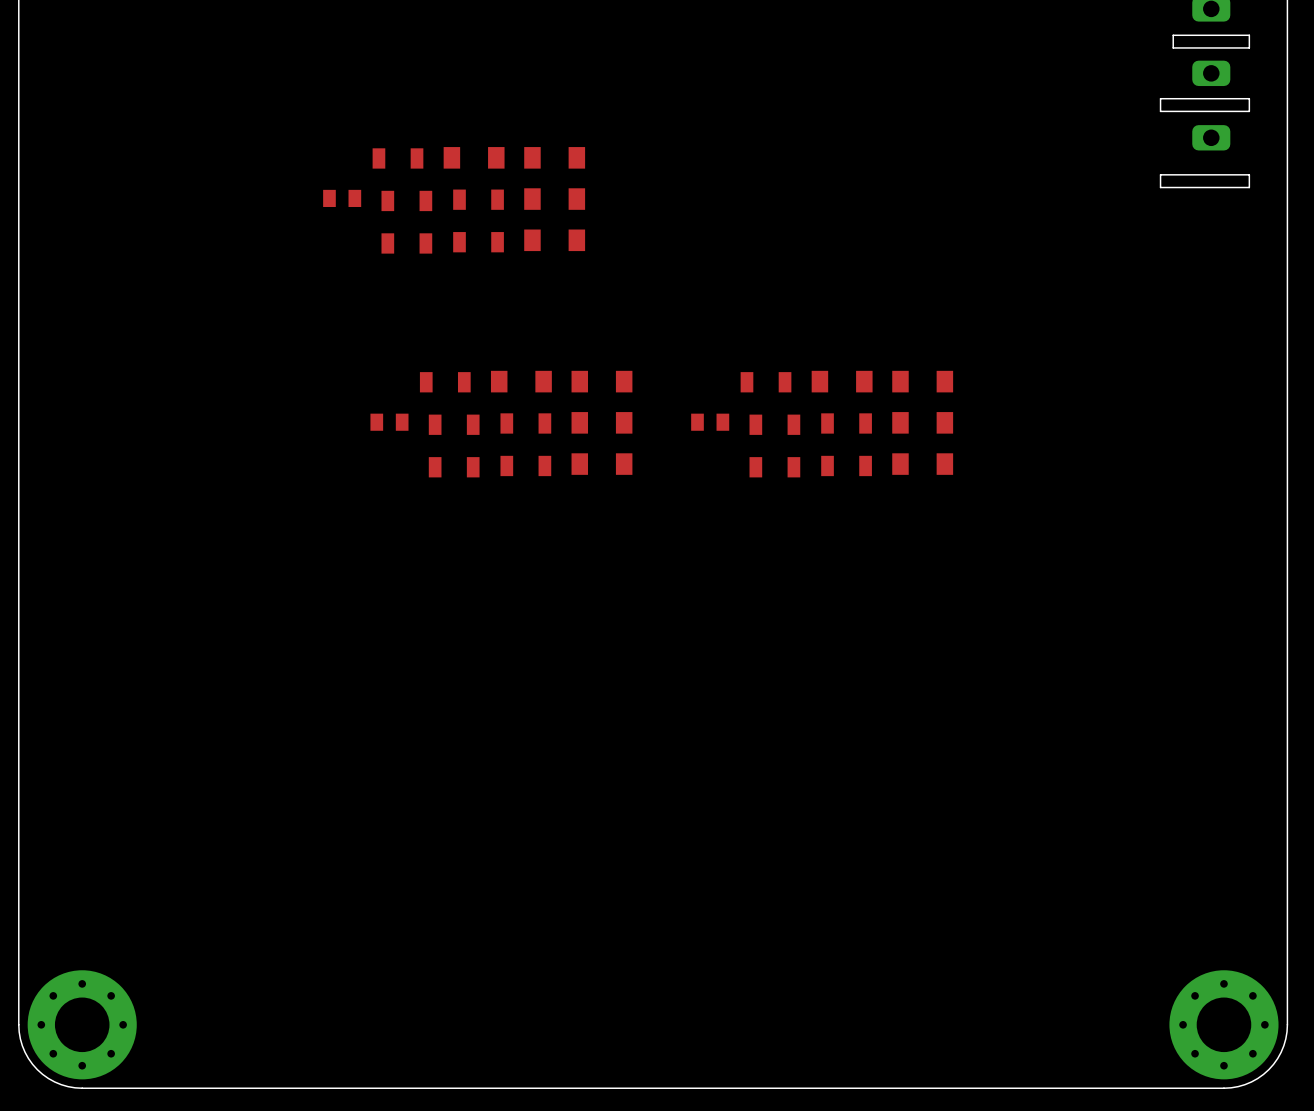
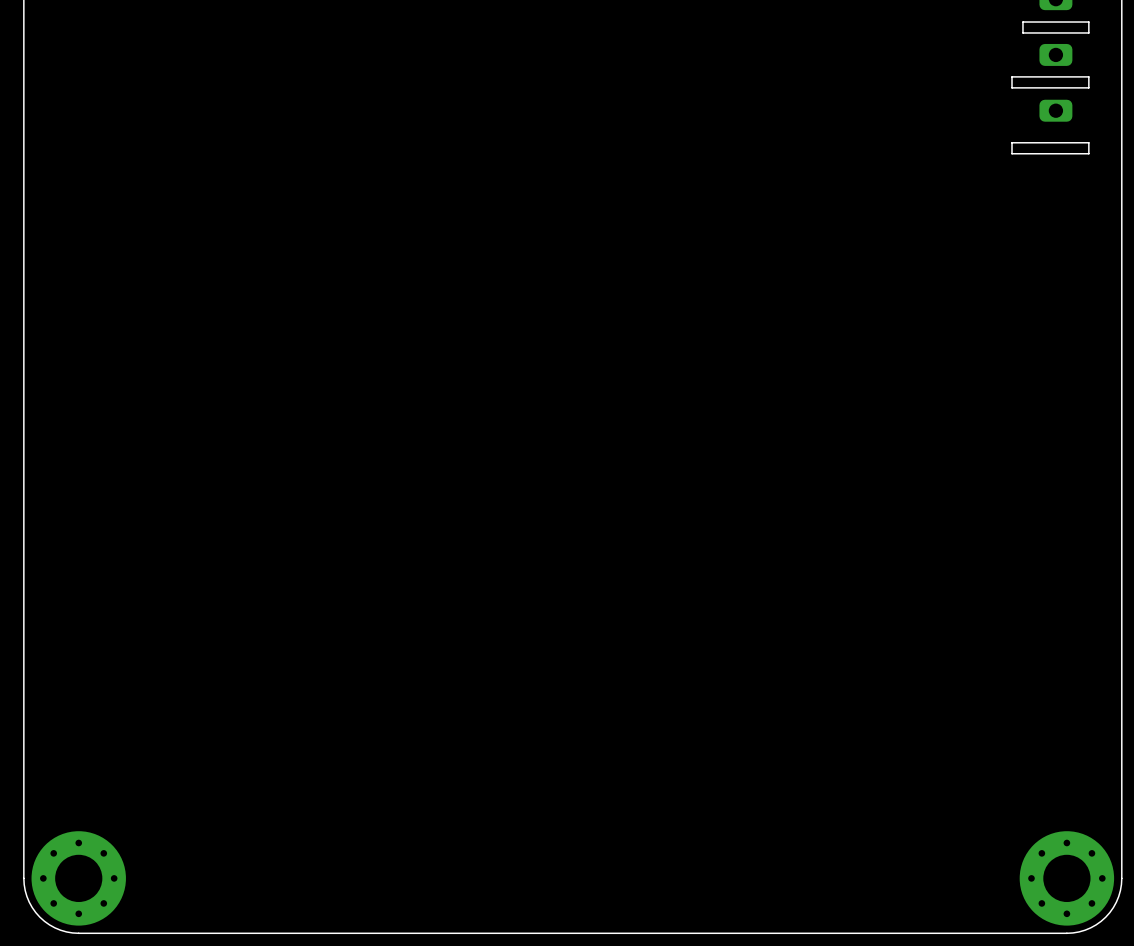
part: (474, 157) -> none
part: (554, 157) -> none
part: (397, 158) -> none
part: (342, 198) -> none
part: (478, 199) -> none
part: (554, 199) -> none
part: (406, 200) -> none
part: (554, 240) -> none
part: (478, 242) -> none
part: (406, 243) -> none
part: (521, 381) -> none
part: (601, 381) -> none
part: (842, 381) -> none
part: (922, 381) -> none
part: (445, 382) -> none
part: (766, 382) -> none
part: (389, 422) -> none
part: (601, 422) -> none
part: (710, 422) -> none
part: (922, 422) -> none
part: (525, 423) -> none
part: (846, 423) -> none
part: (454, 424) -> none
part: (774, 424) -> none
part: (601, 464) -> none
part: (922, 464) -> none
part: (525, 465) -> none
part: (846, 465) -> none
part: (454, 467) -> none
part: (774, 467) -> none

